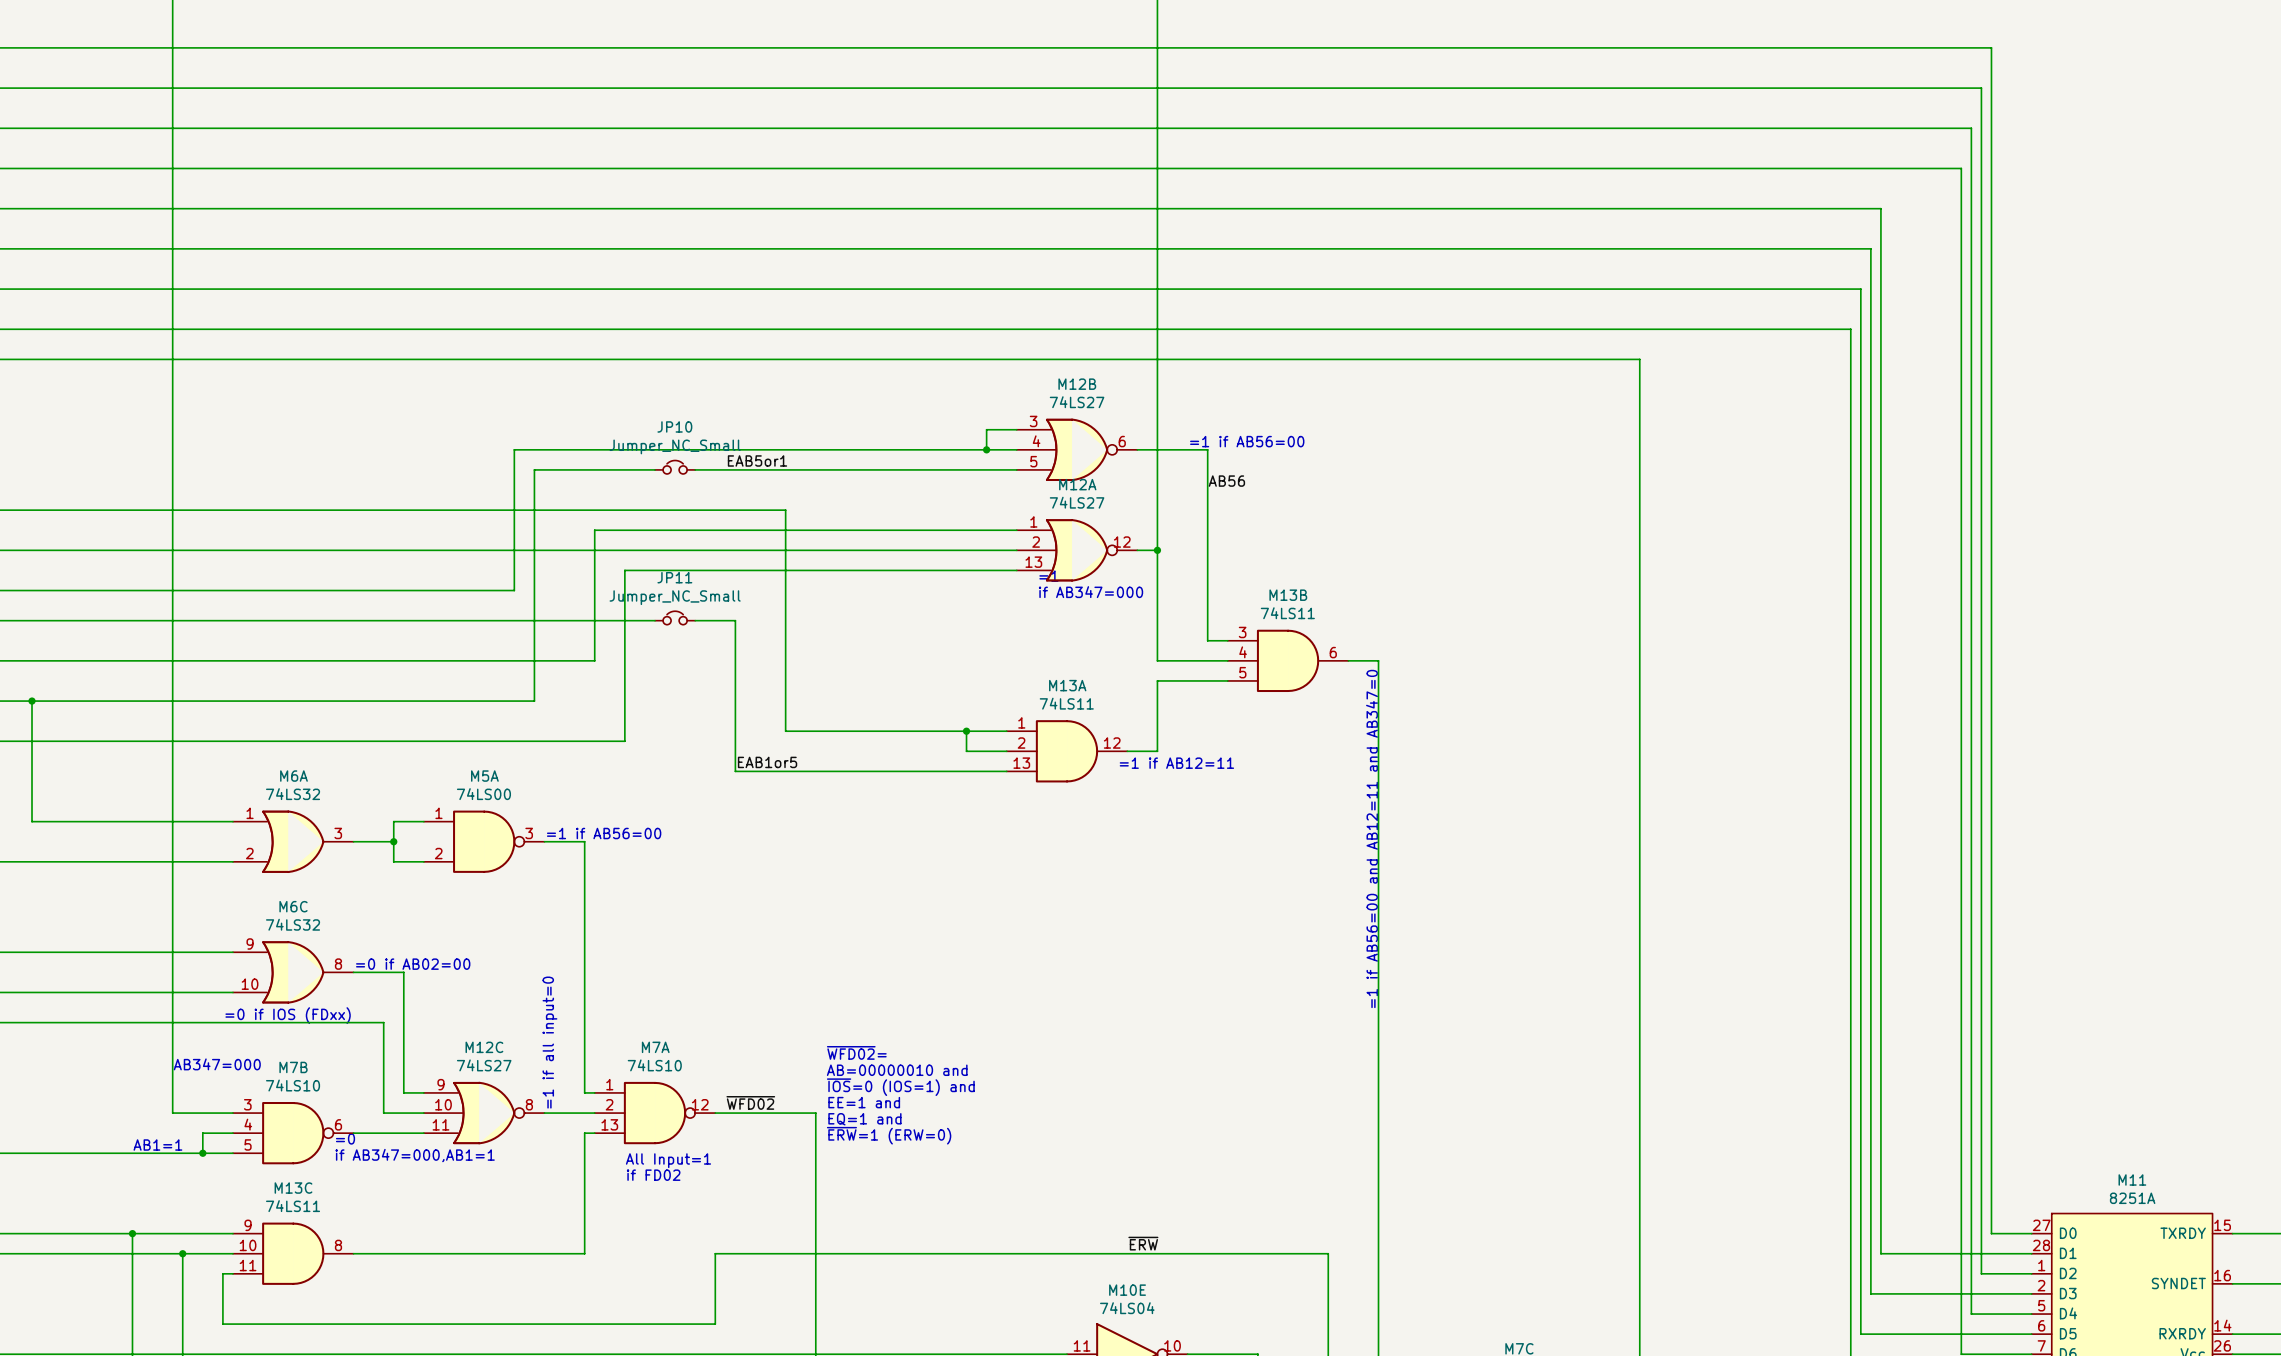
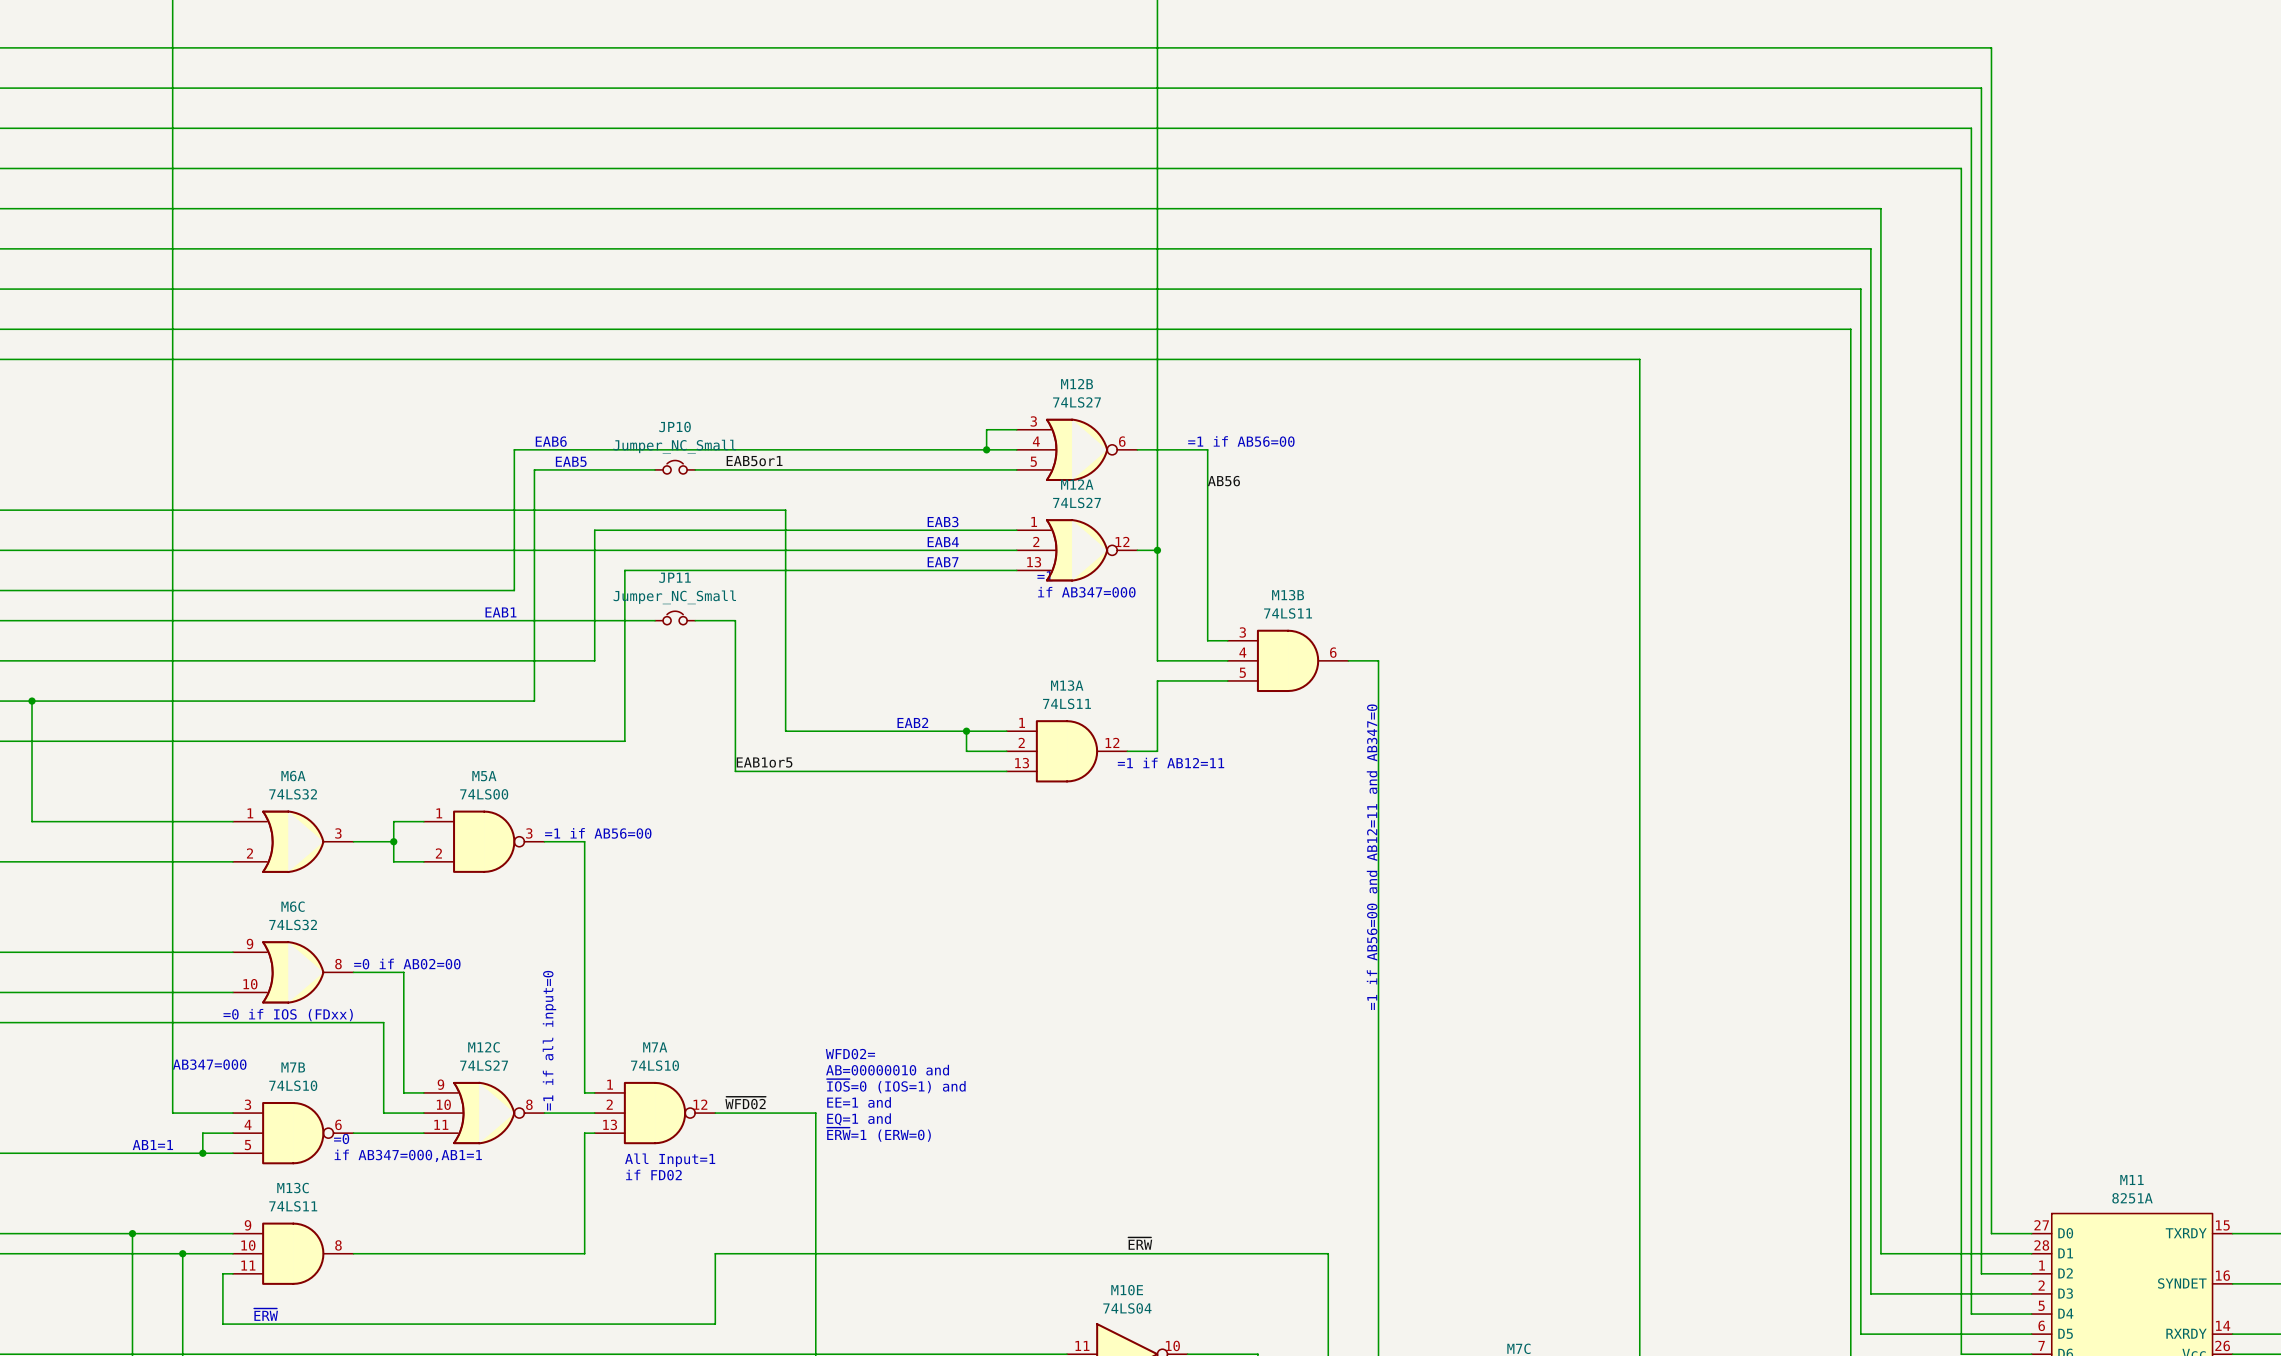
text: none -> EAB6 (551, 441)
text: none -> EAB5 (571, 461)
text: none -> EAB3 (943, 522)
text: none -> EAB4 (943, 542)
text: none -> EAB7 (943, 562)
text: none -> EAB1 (500, 612)
text: none -> EAB2 (912, 722)
text: ~{WFD02}= (856, 1052) -> WFD02= (850, 1054)
text: none -> ~{ERW} (266, 1314)

